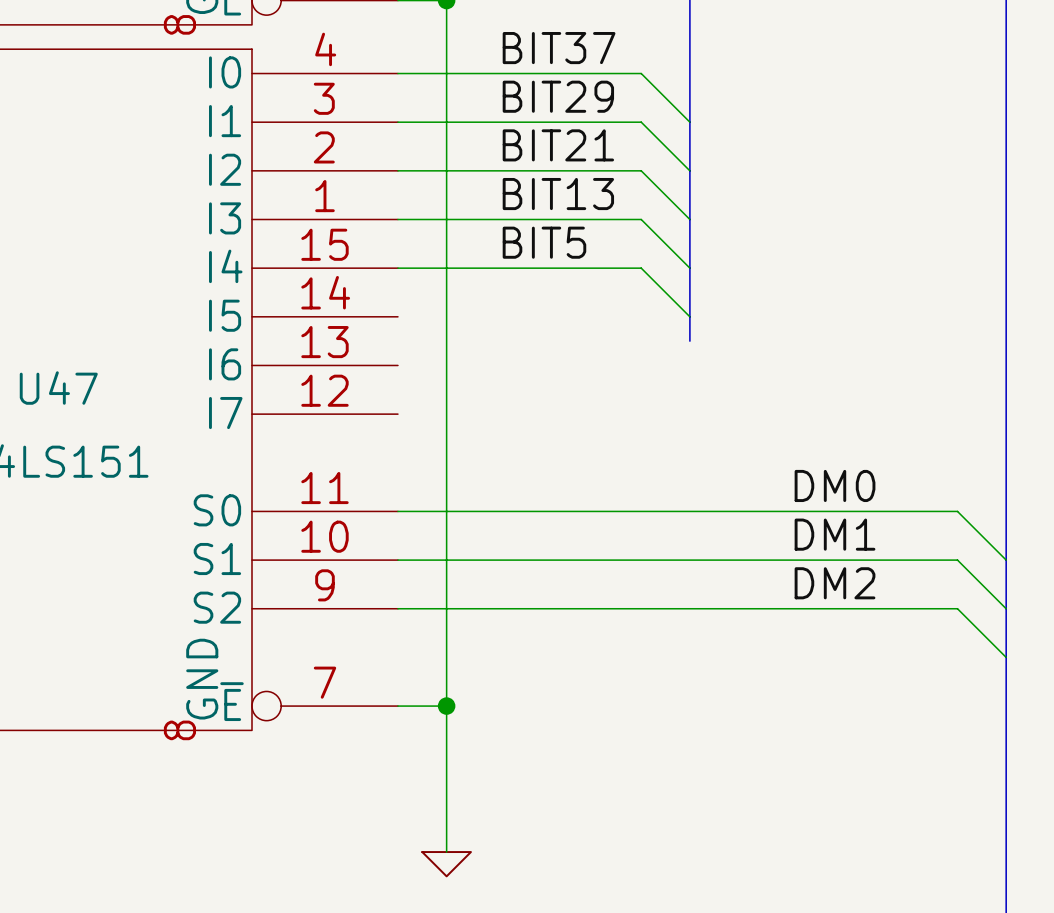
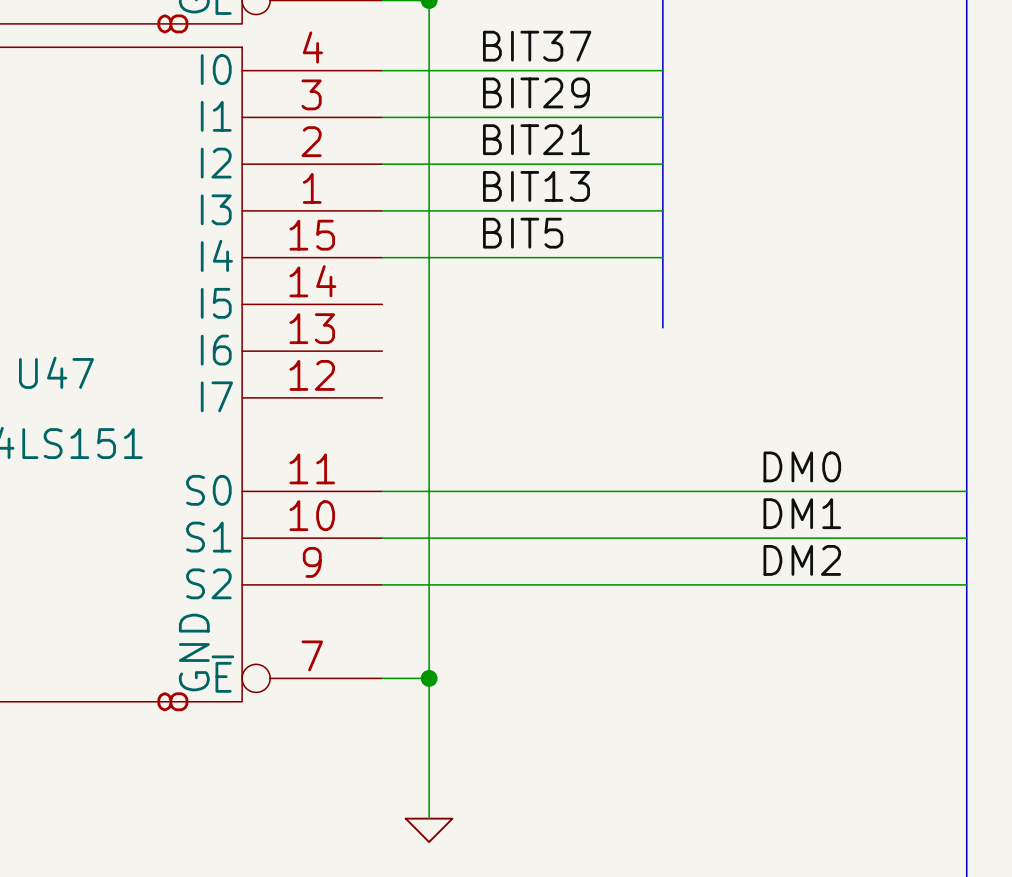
wire: (641, 73) (689, 122) -> (616, 70) (662, 70)
wire: (641, 122) (689, 170) -> (616, 117) (662, 117)
wire: (641, 170) (689, 219) -> (616, 164) (662, 164)
wire: (641, 219) (689, 268) -> (616, 210) (662, 210)
wire: (641, 268) (689, 316) -> (616, 257) (662, 257)
wire: (957, 511) (1006, 560) -> (919, 491) (966, 491)
wire: (957, 560) (1006, 608) -> (919, 538) (966, 538)
wire: (957, 608) (1006, 657) -> (919, 584) (966, 584)

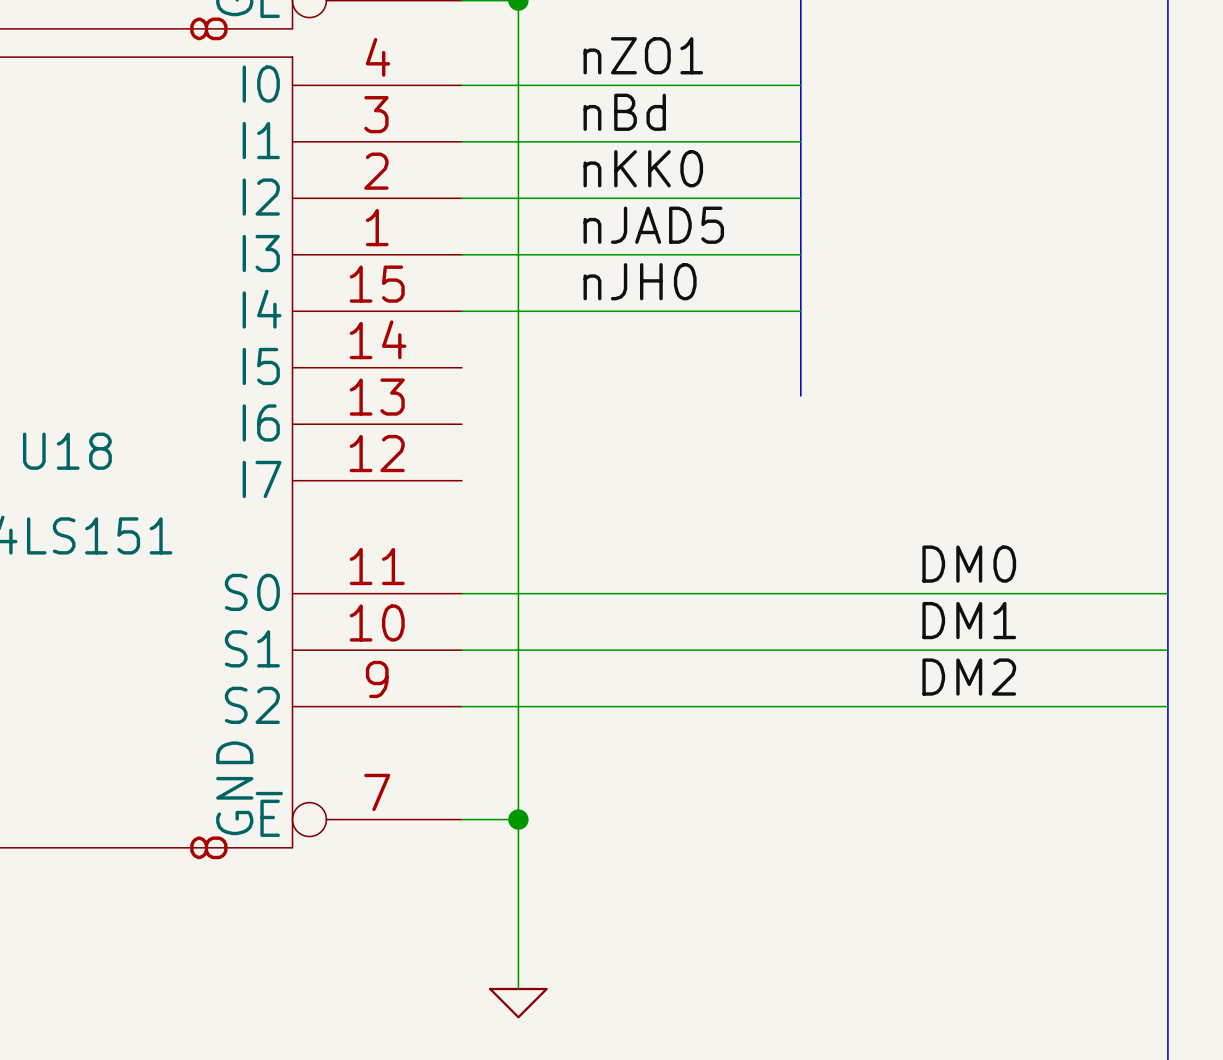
label: BIT37 (537, 46) -> nZO1 (643, 55)
label: BIT29 (536, 92) -> nBd (624, 112)
label: BIT21 (536, 139) -> nKK0 (643, 168)
label: BIT13 (536, 186) -> nJAD5 (653, 225)
label: BIT5 (523, 233) -> nJH0 (640, 281)
U47 name: U47 (56, 372) -> U18 (67, 451)

